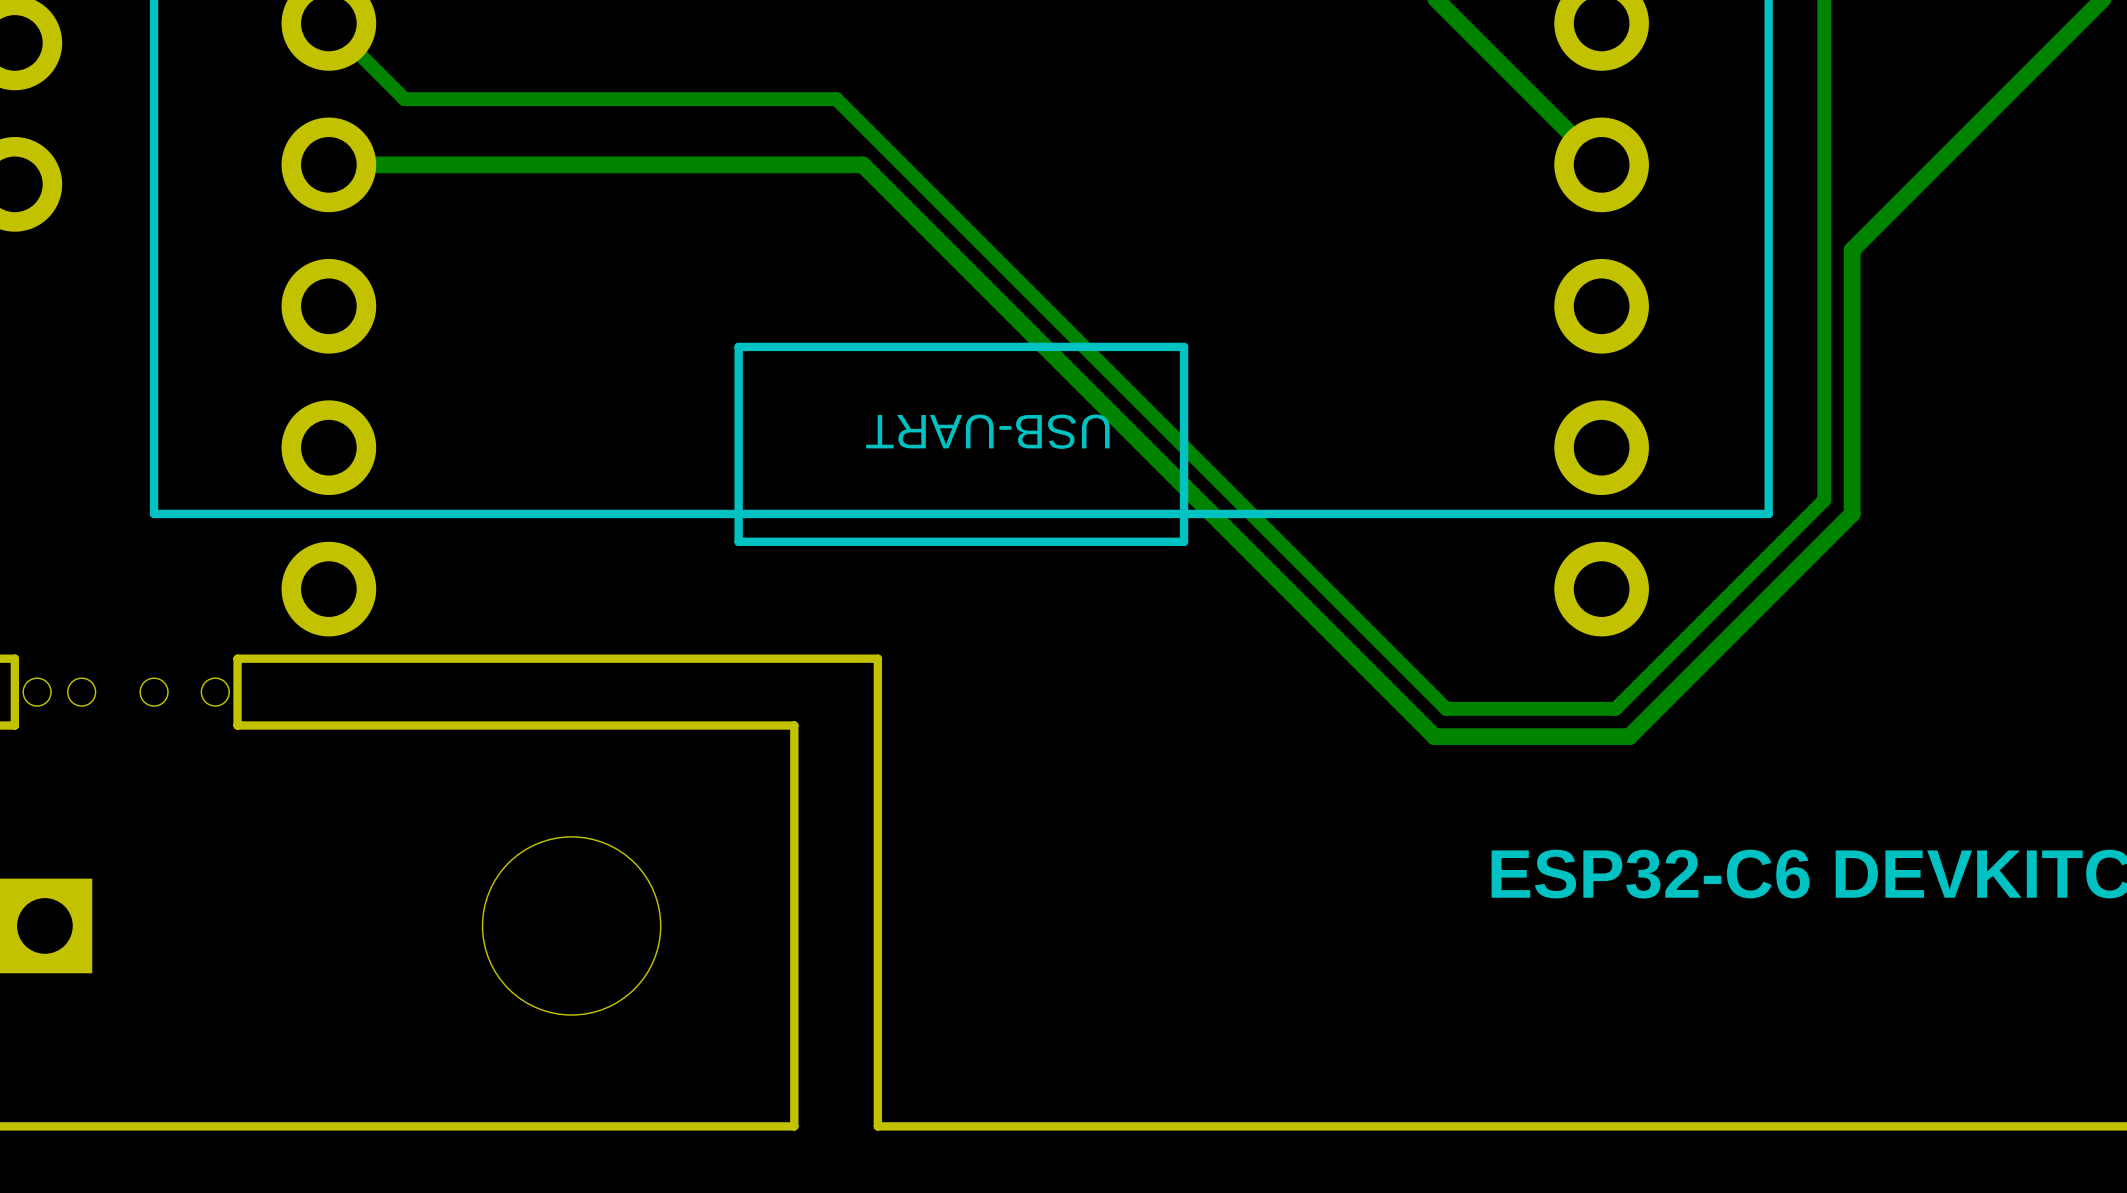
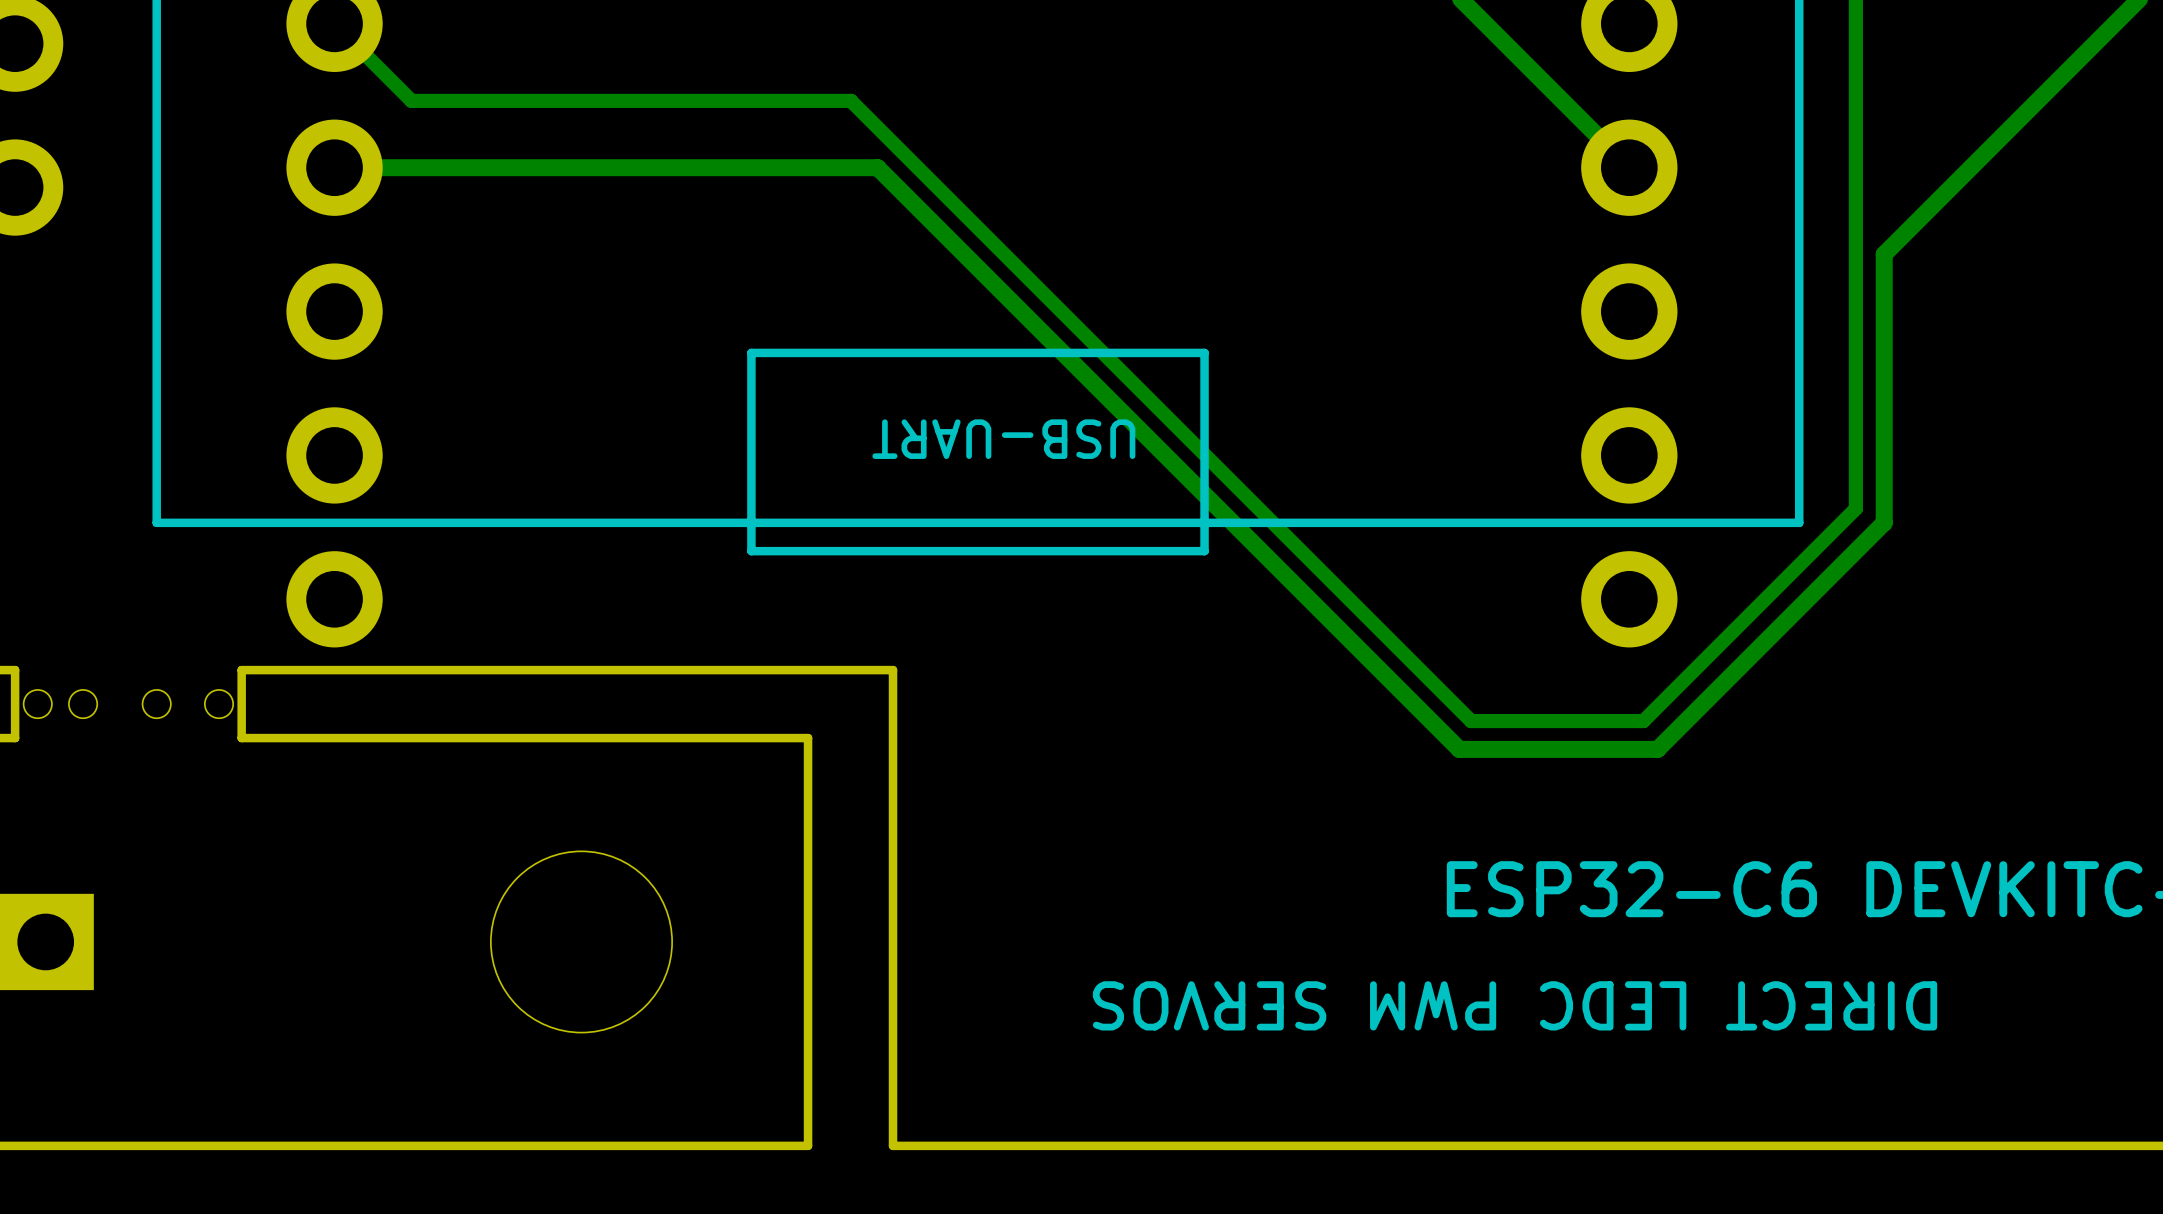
text: none -> DIRECT LEDC PWM SERVOS (1515, 1005)

